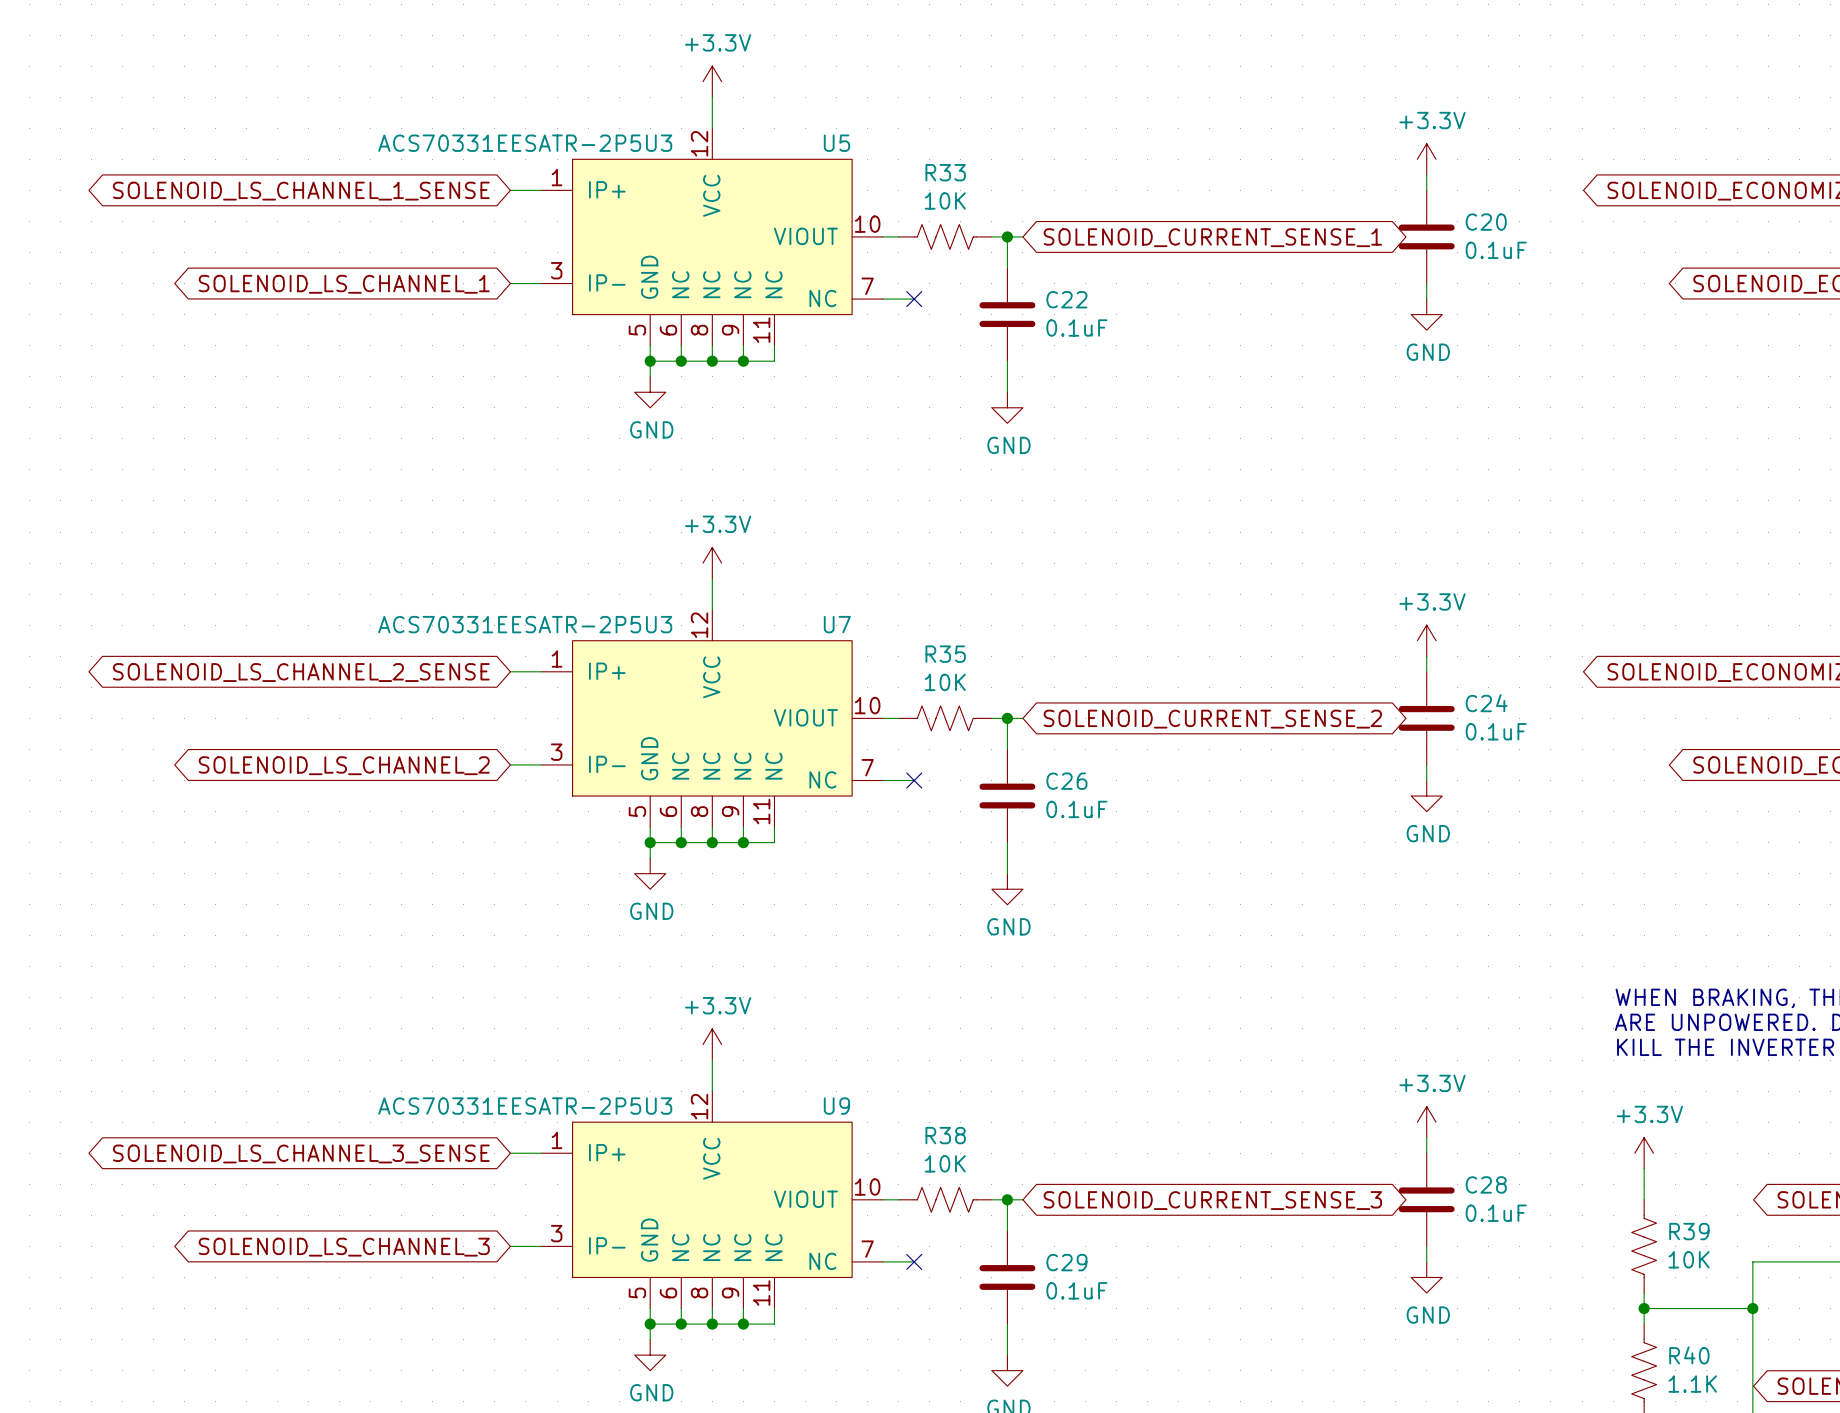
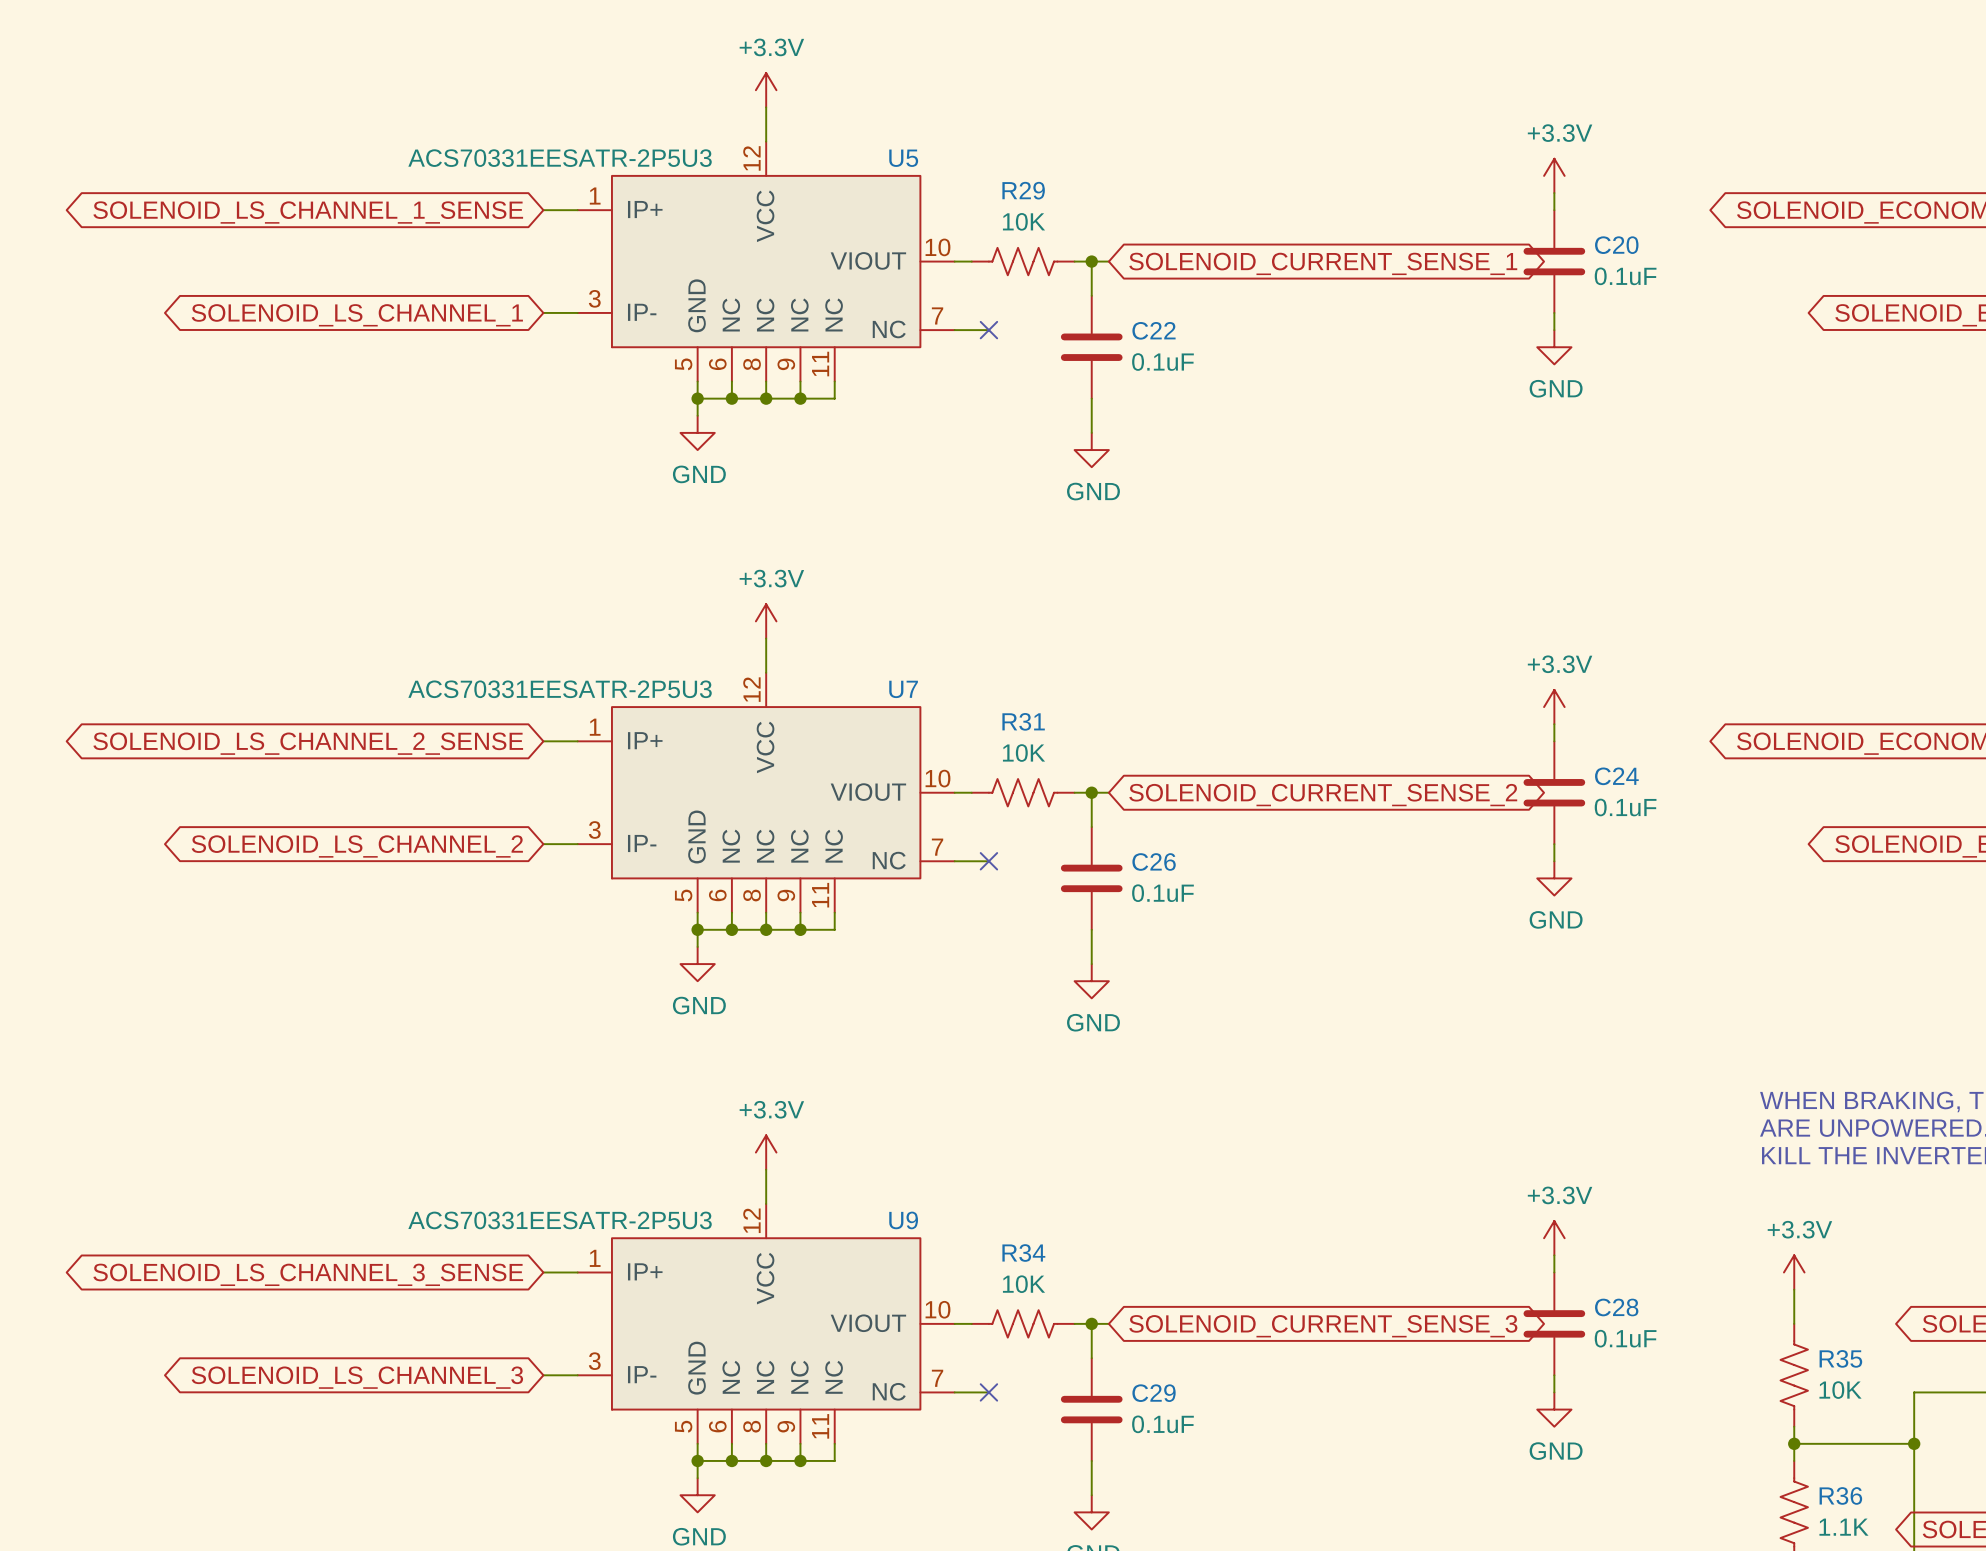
R33 name: R33 (945, 172) -> R29 (1023, 190)
R35 name: R35 (945, 654) -> R31 (1023, 721)
R38 name: R38 (945, 1135) -> R34 (1023, 1253)
R39 name: R39 (1689, 1231) -> R35 (1840, 1358)
R40 name: R40 (1689, 1355) -> R36 (1840, 1495)

